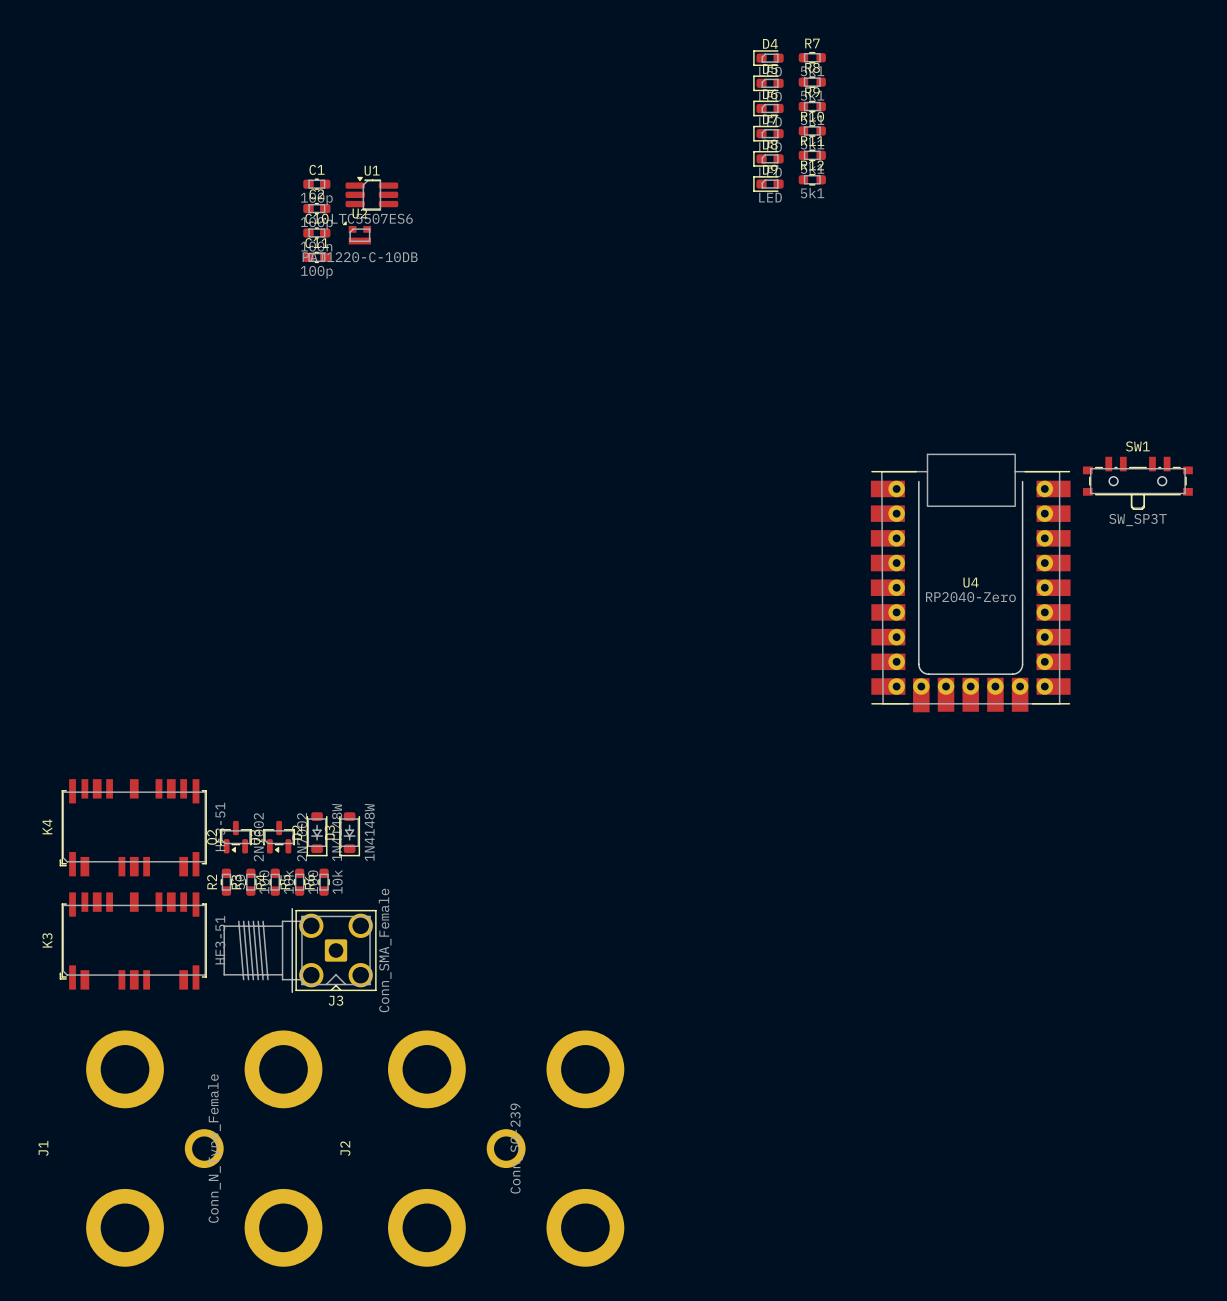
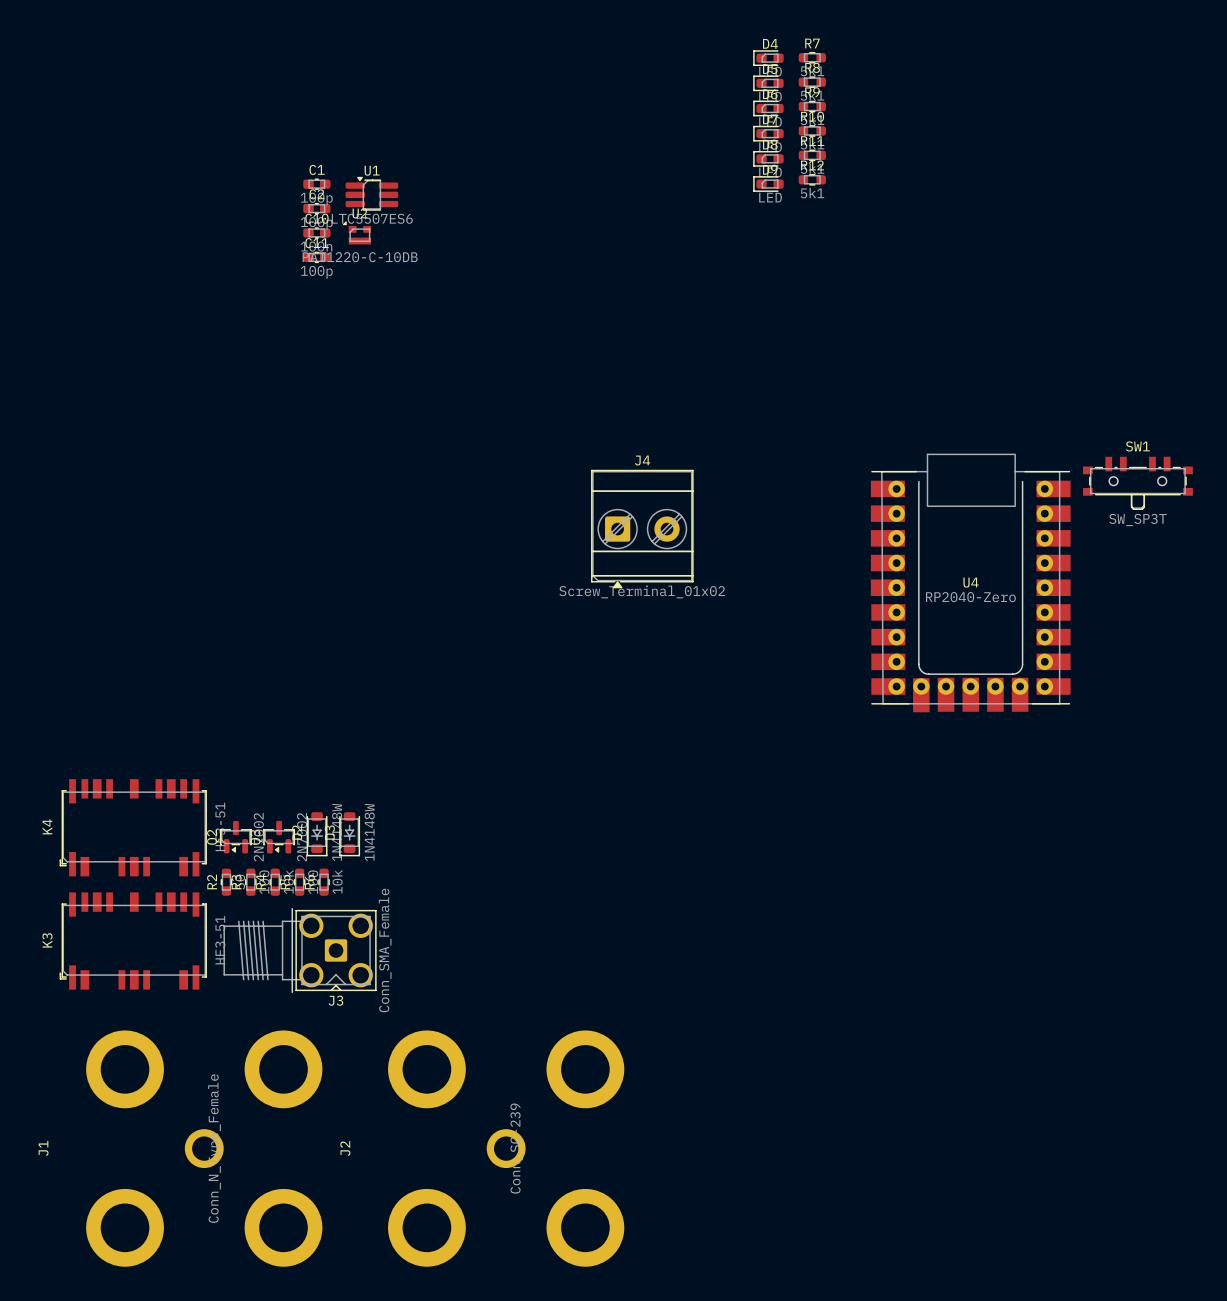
J4: none -> Screw_Terminal_01x02 (642, 529)

